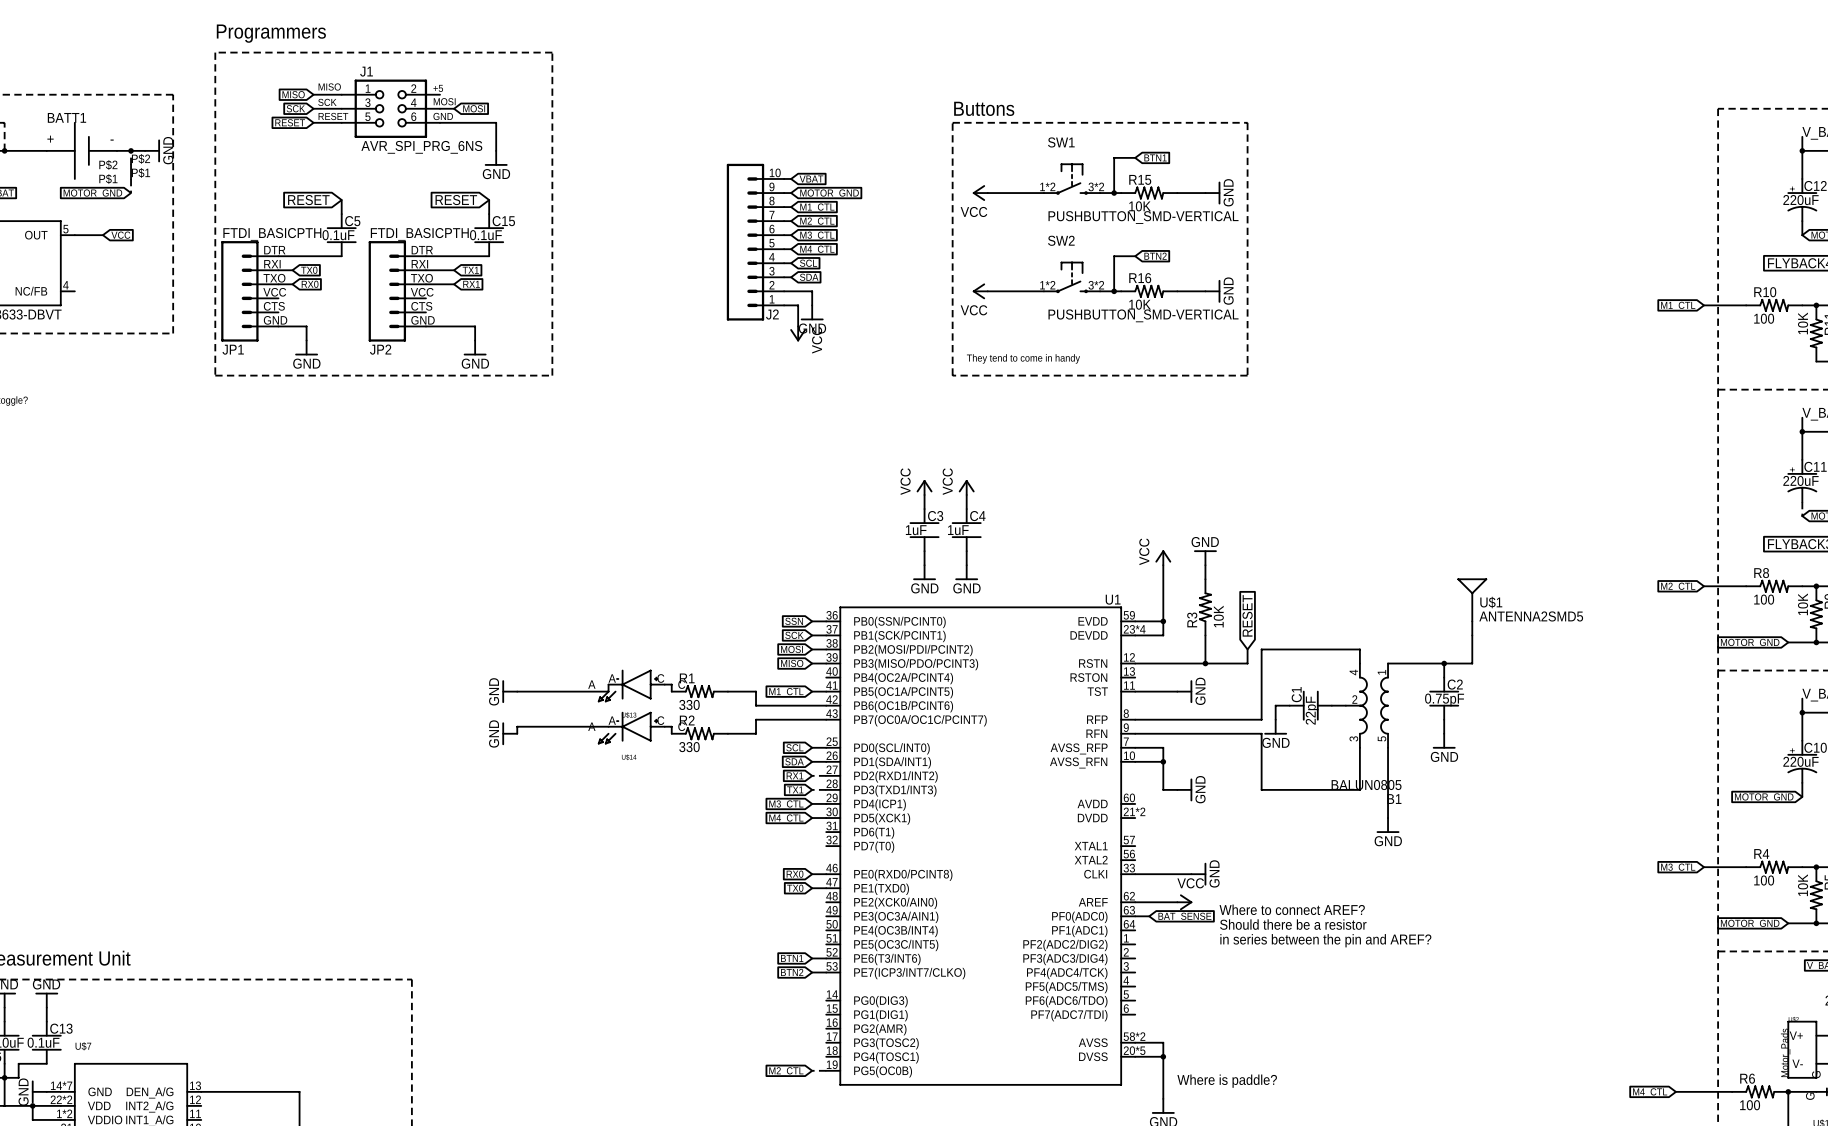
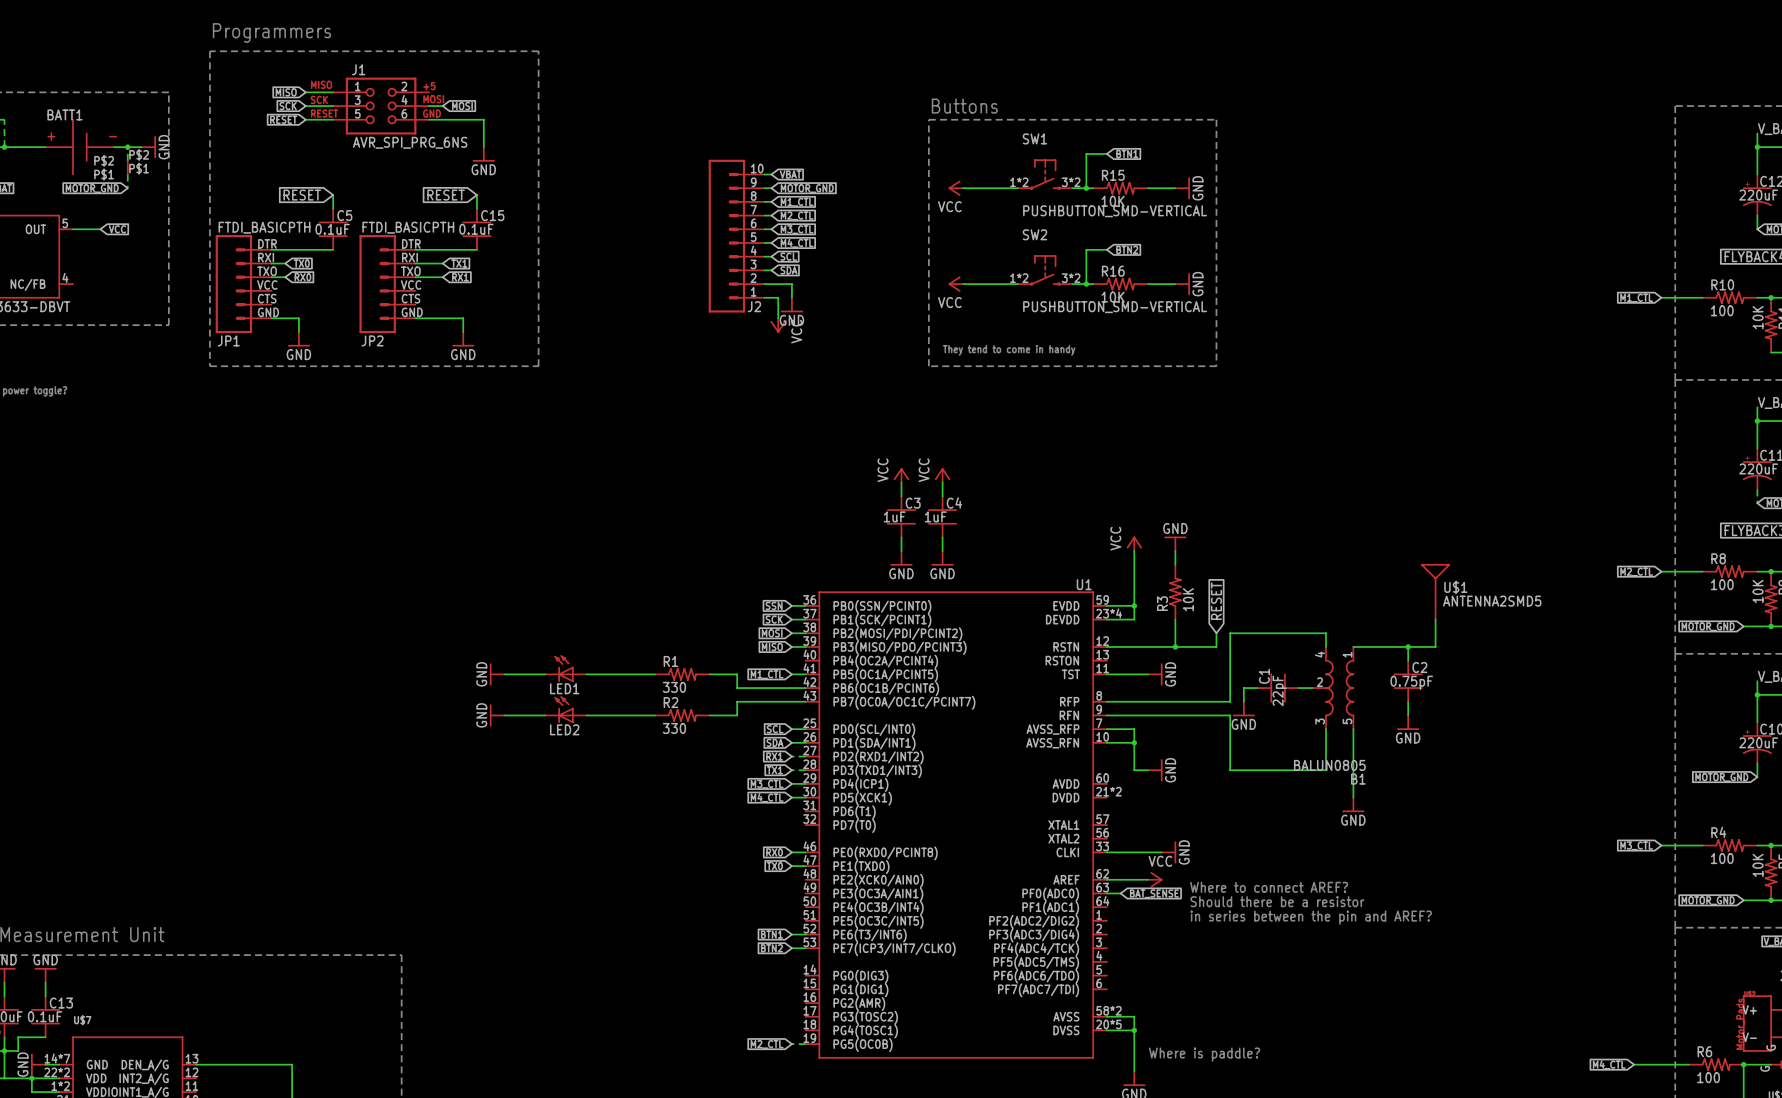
wire: (608, 684) (608, 691) -> none
wire: (664, 684) (671, 684) (671, 691) -> (593, 674) (654, 674)
LED1: none -> (565, 668)
part: (631, 685) -> none
wire: (608, 726) (517, 726) (517, 733) -> (545, 715) (504, 715)
wire: (664, 726) (671, 726) (671, 733) -> (586, 715) (654, 715)
LED2: none -> (565, 709)
part: (631, 728) -> none

